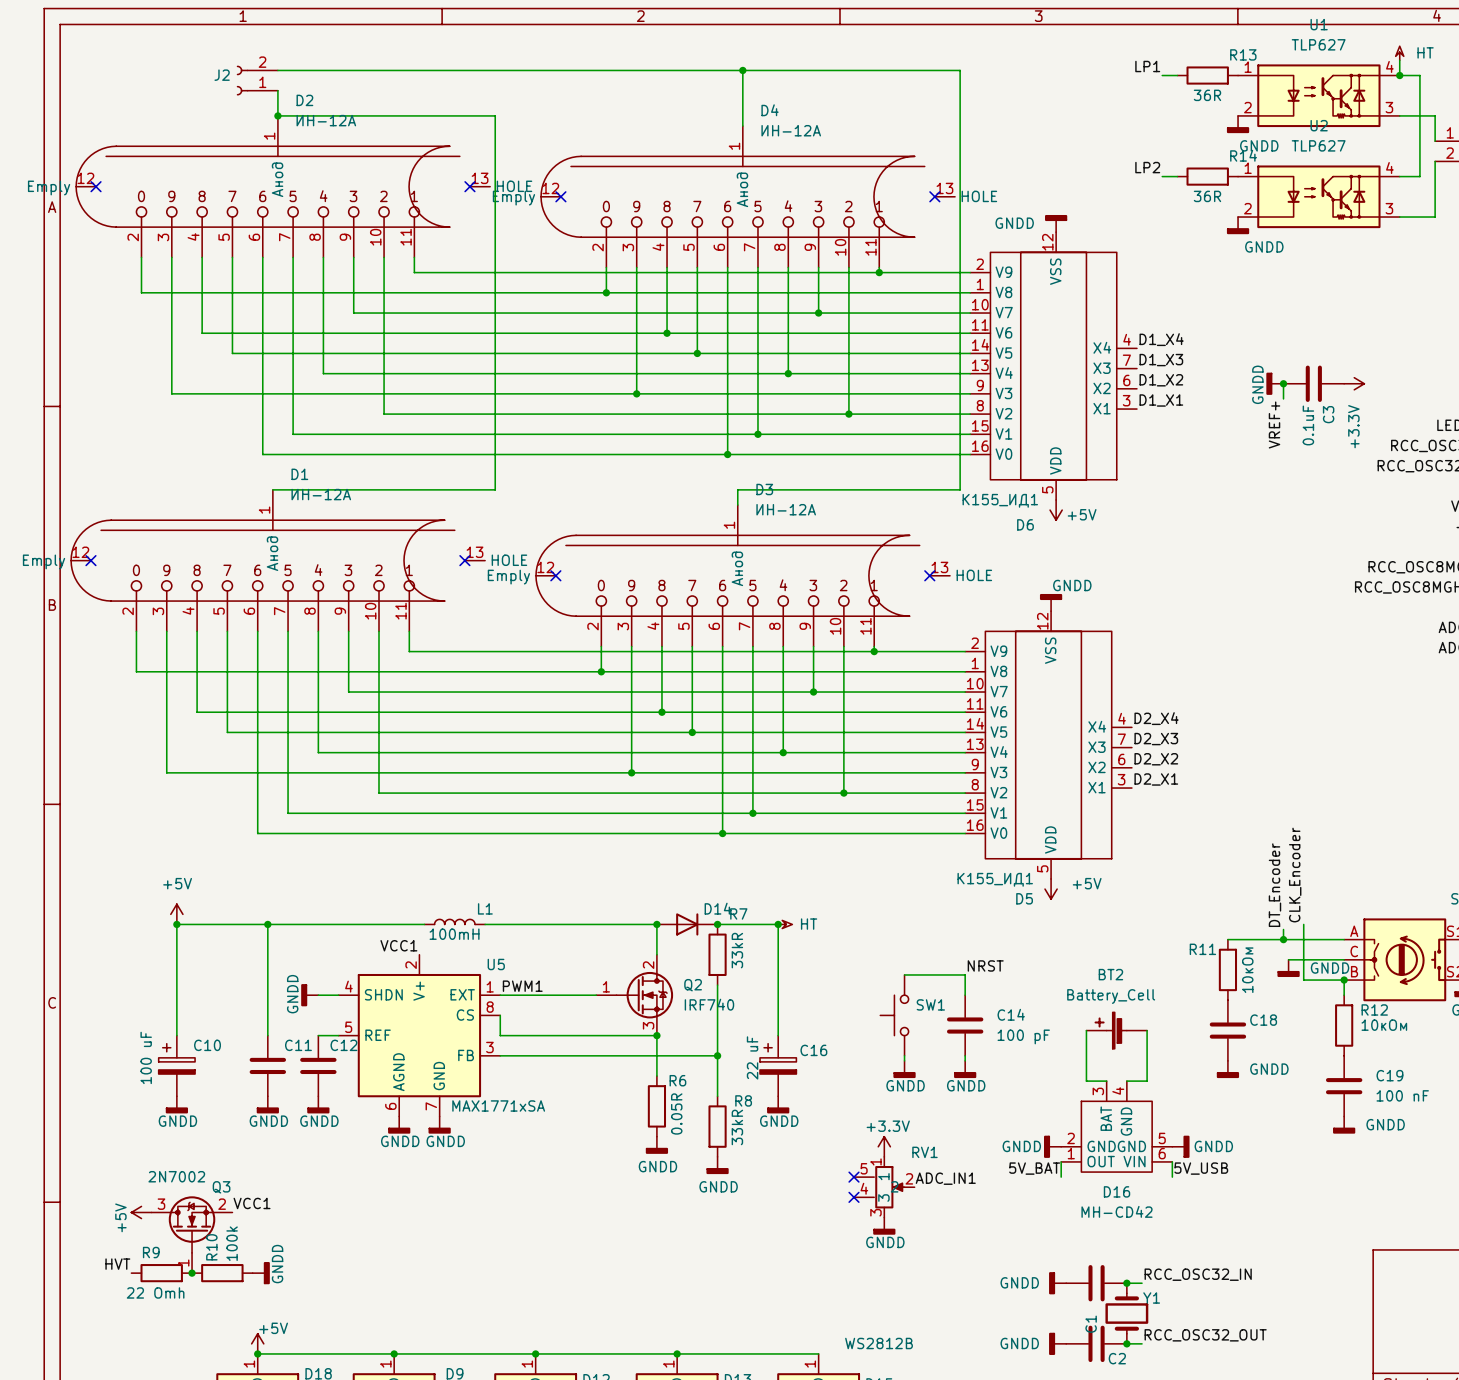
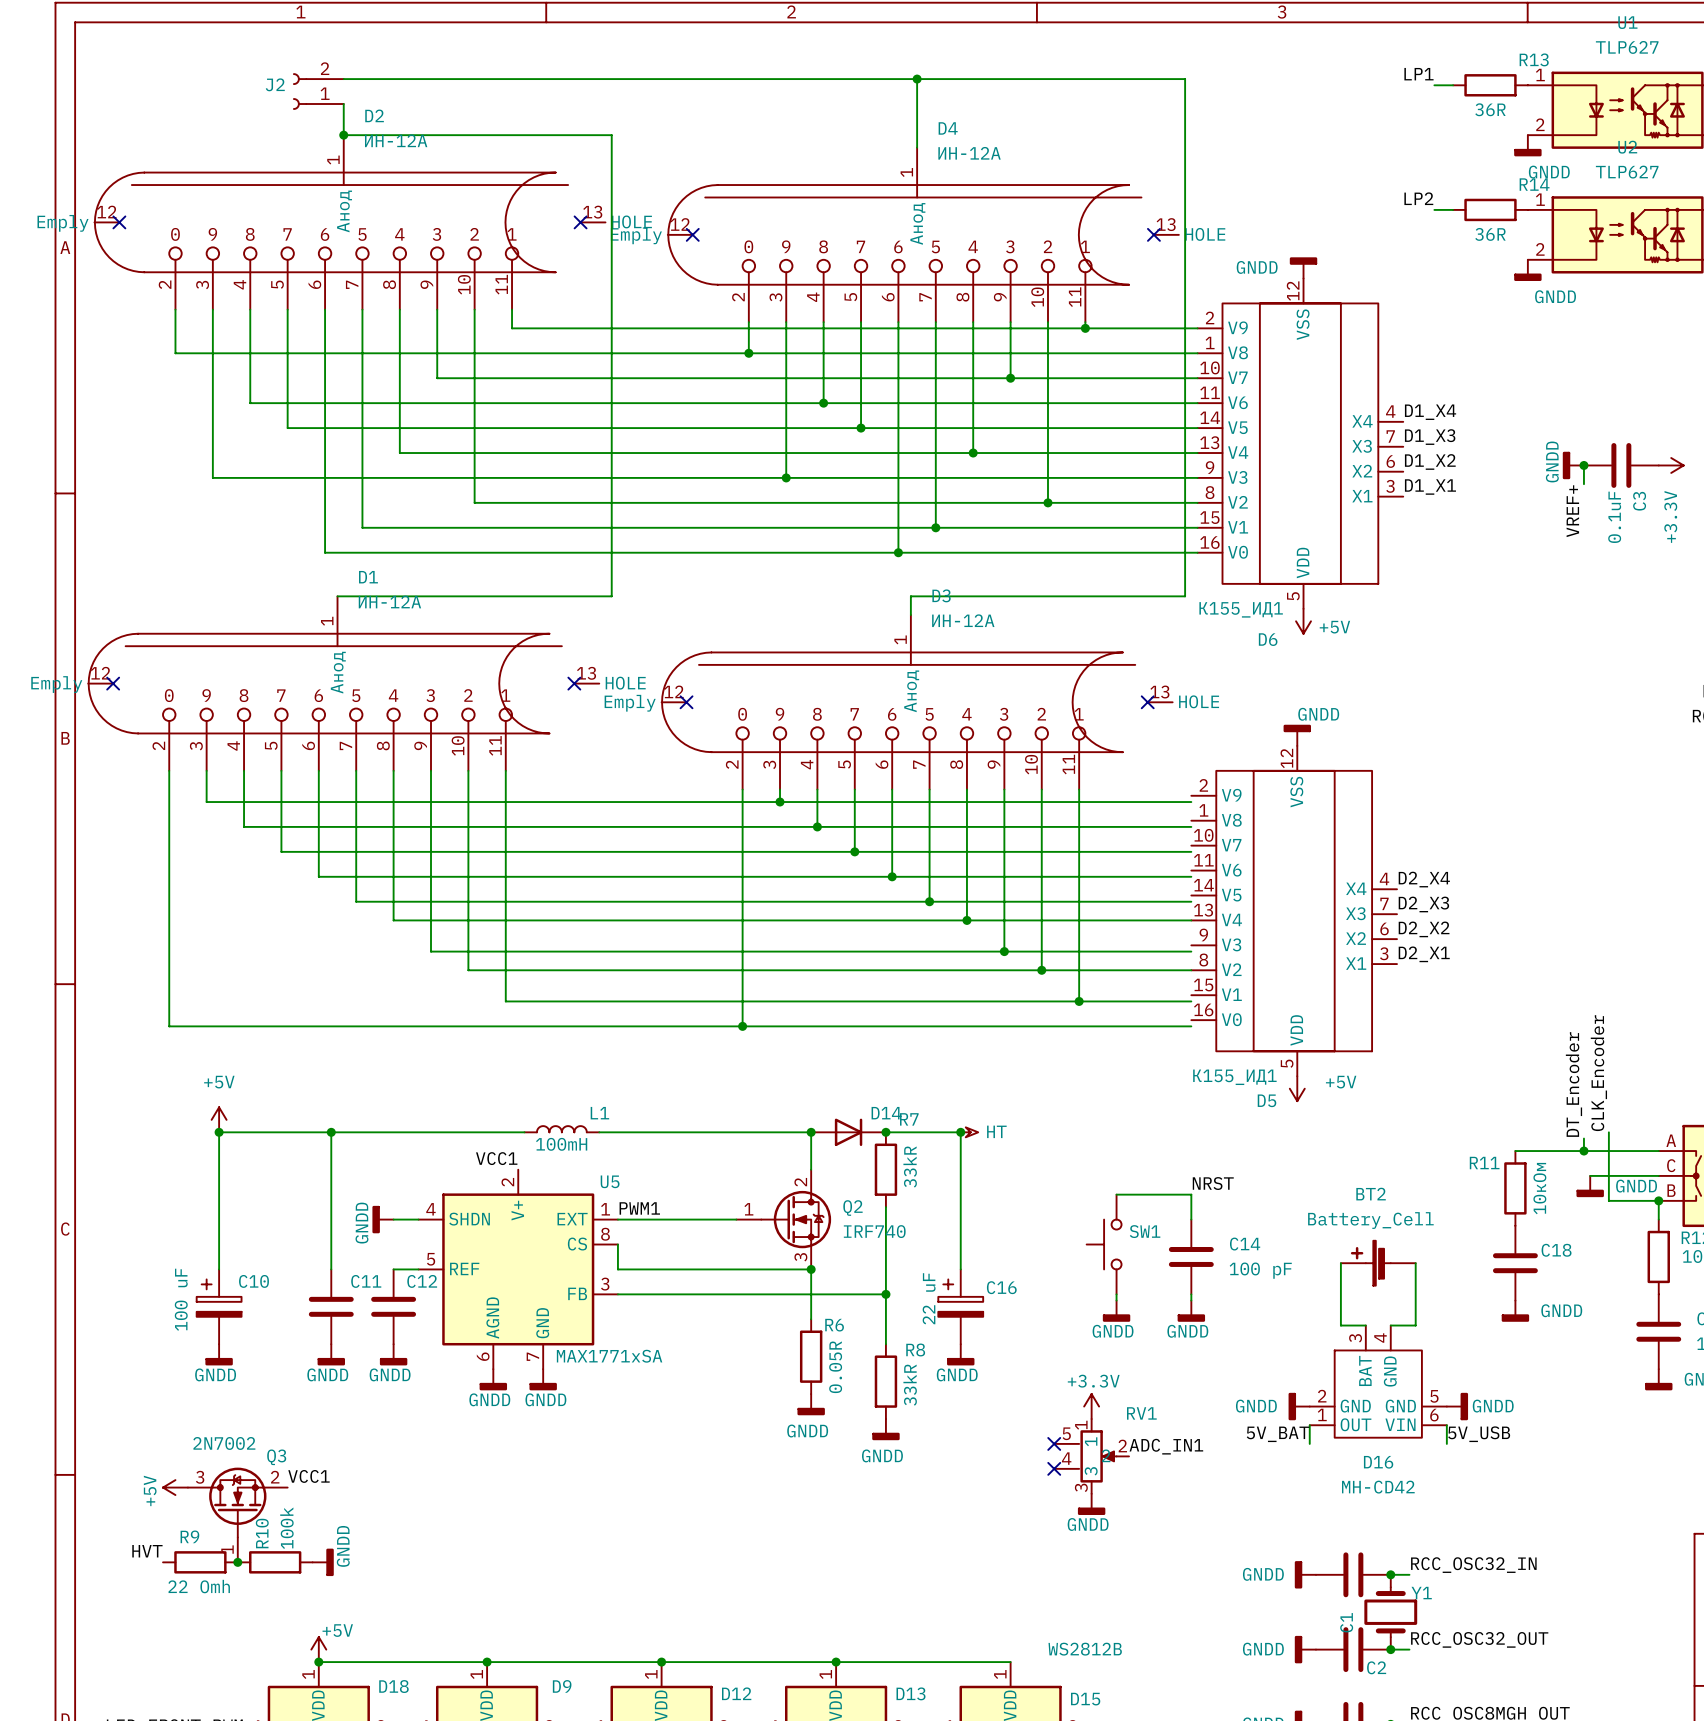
wire: (409, 651) (965, 651) -> (505, 795) (505, 1001) (1191, 1001)
wire: none -> (1079, 795) (1079, 1001)
junction: (874, 651) -> none
wire: (166, 656) (166, 772) (965, 772) -> (206, 802) (1191, 802)
wire: (631, 656) (631, 772) -> none
junction: none -> (780, 802)
wire: (136, 671) (965, 671) -> (169, 820) (169, 1026) (1191, 1026)
wire: none -> (742, 820) (742, 1026)
junction: (601, 671) -> none
wire: (197, 676) (197, 712) (965, 712) -> (244, 826) (1191, 826)
wire: (661, 676) (661, 712) -> none
junction: none -> (817, 826)
wire: (348, 692) (965, 692) -> (431, 845) (431, 951) (1191, 951)
wire: none -> (1004, 845) (1004, 951)
junction: (813, 692) -> none
wire: (227, 697) (227, 732) (965, 732) -> (281, 851) (1191, 851)
wire: (692, 697) (692, 732) -> none
junction: none -> (854, 851)
junction: (661, 712) -> none
wire: (257, 717) (257, 833) (965, 833) -> (318, 876) (1191, 876)
wire: (722, 717) (722, 833) -> none
junction: none -> (892, 876)
junction: (692, 732) -> none
wire: (288, 737) (288, 813) (965, 813) -> (356, 901) (1191, 901)
wire: (752, 737) (752, 813) -> none
junction: none -> (929, 901)
junction: (631, 772) -> none
junction: none -> (1004, 951)
junction: (752, 813) -> none
junction: none -> (1079, 1001)
junction: (722, 833) -> none
junction: none -> (742, 1026)

